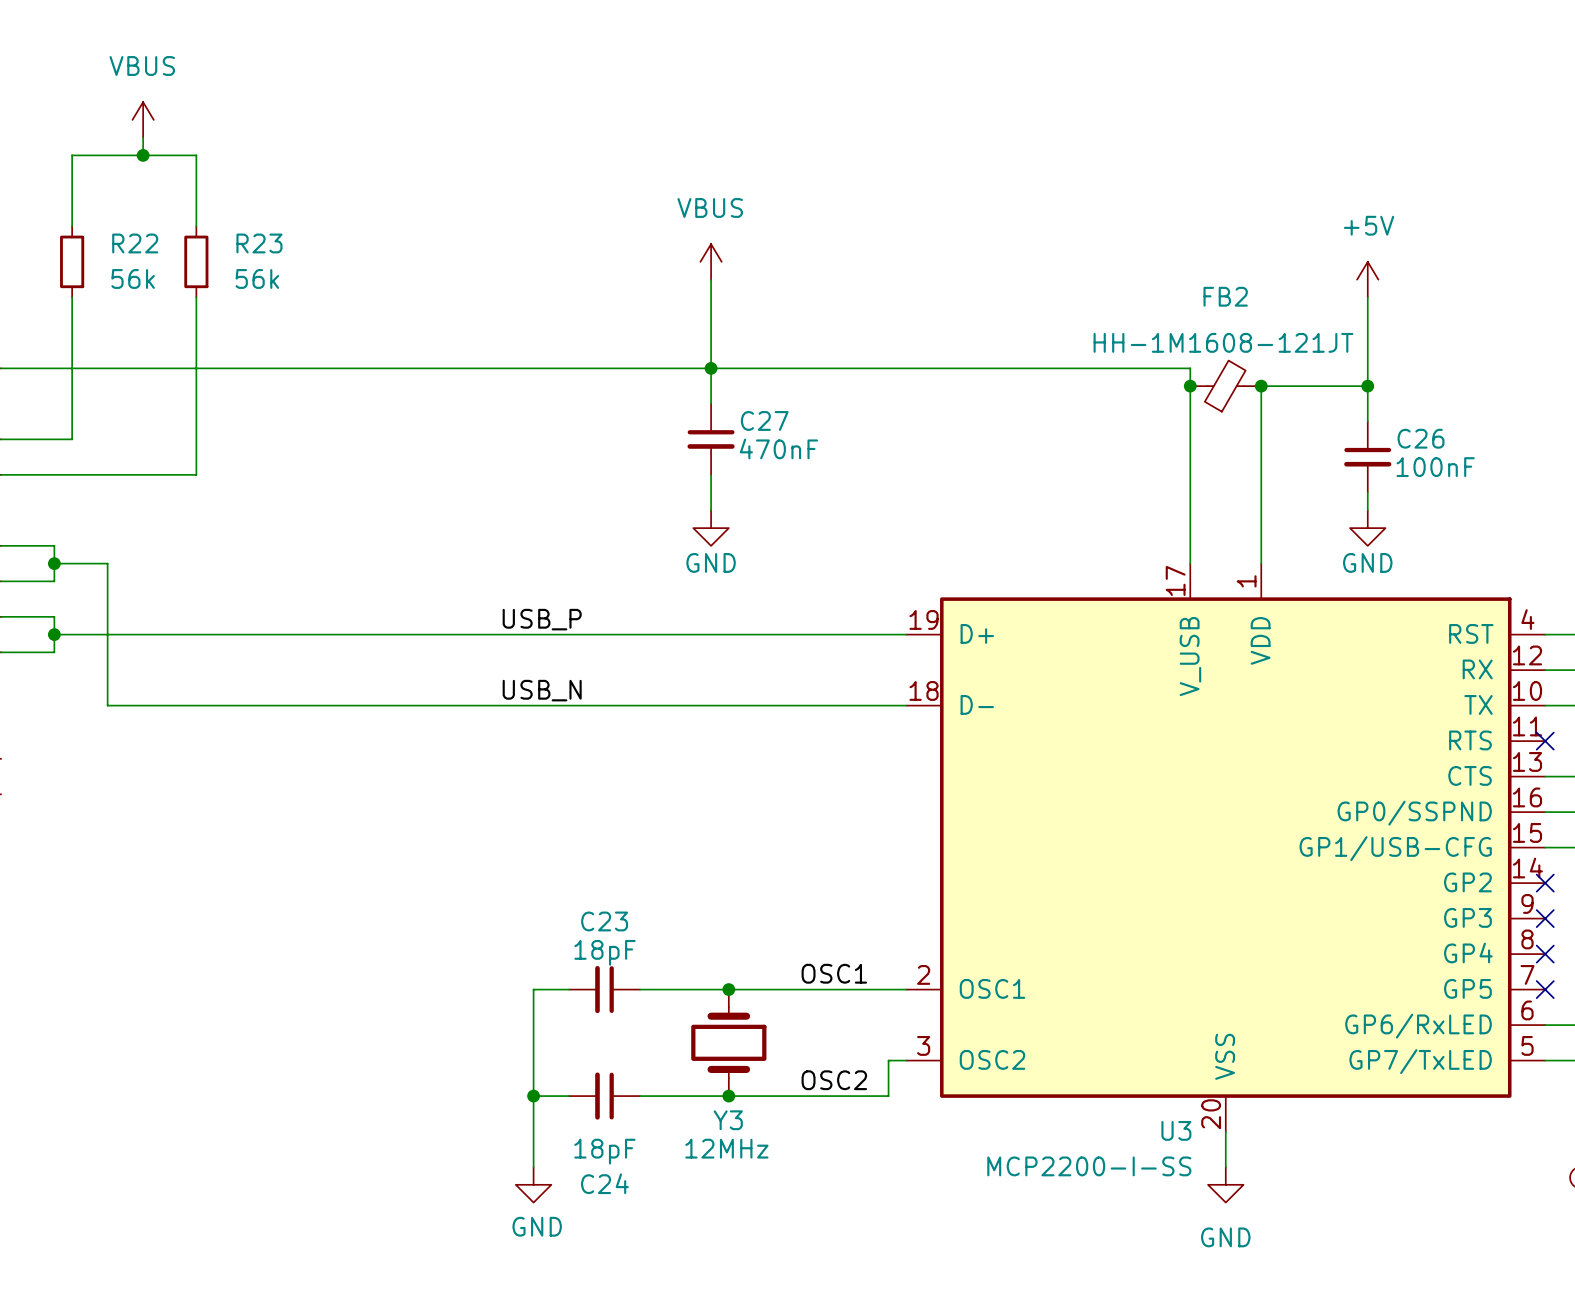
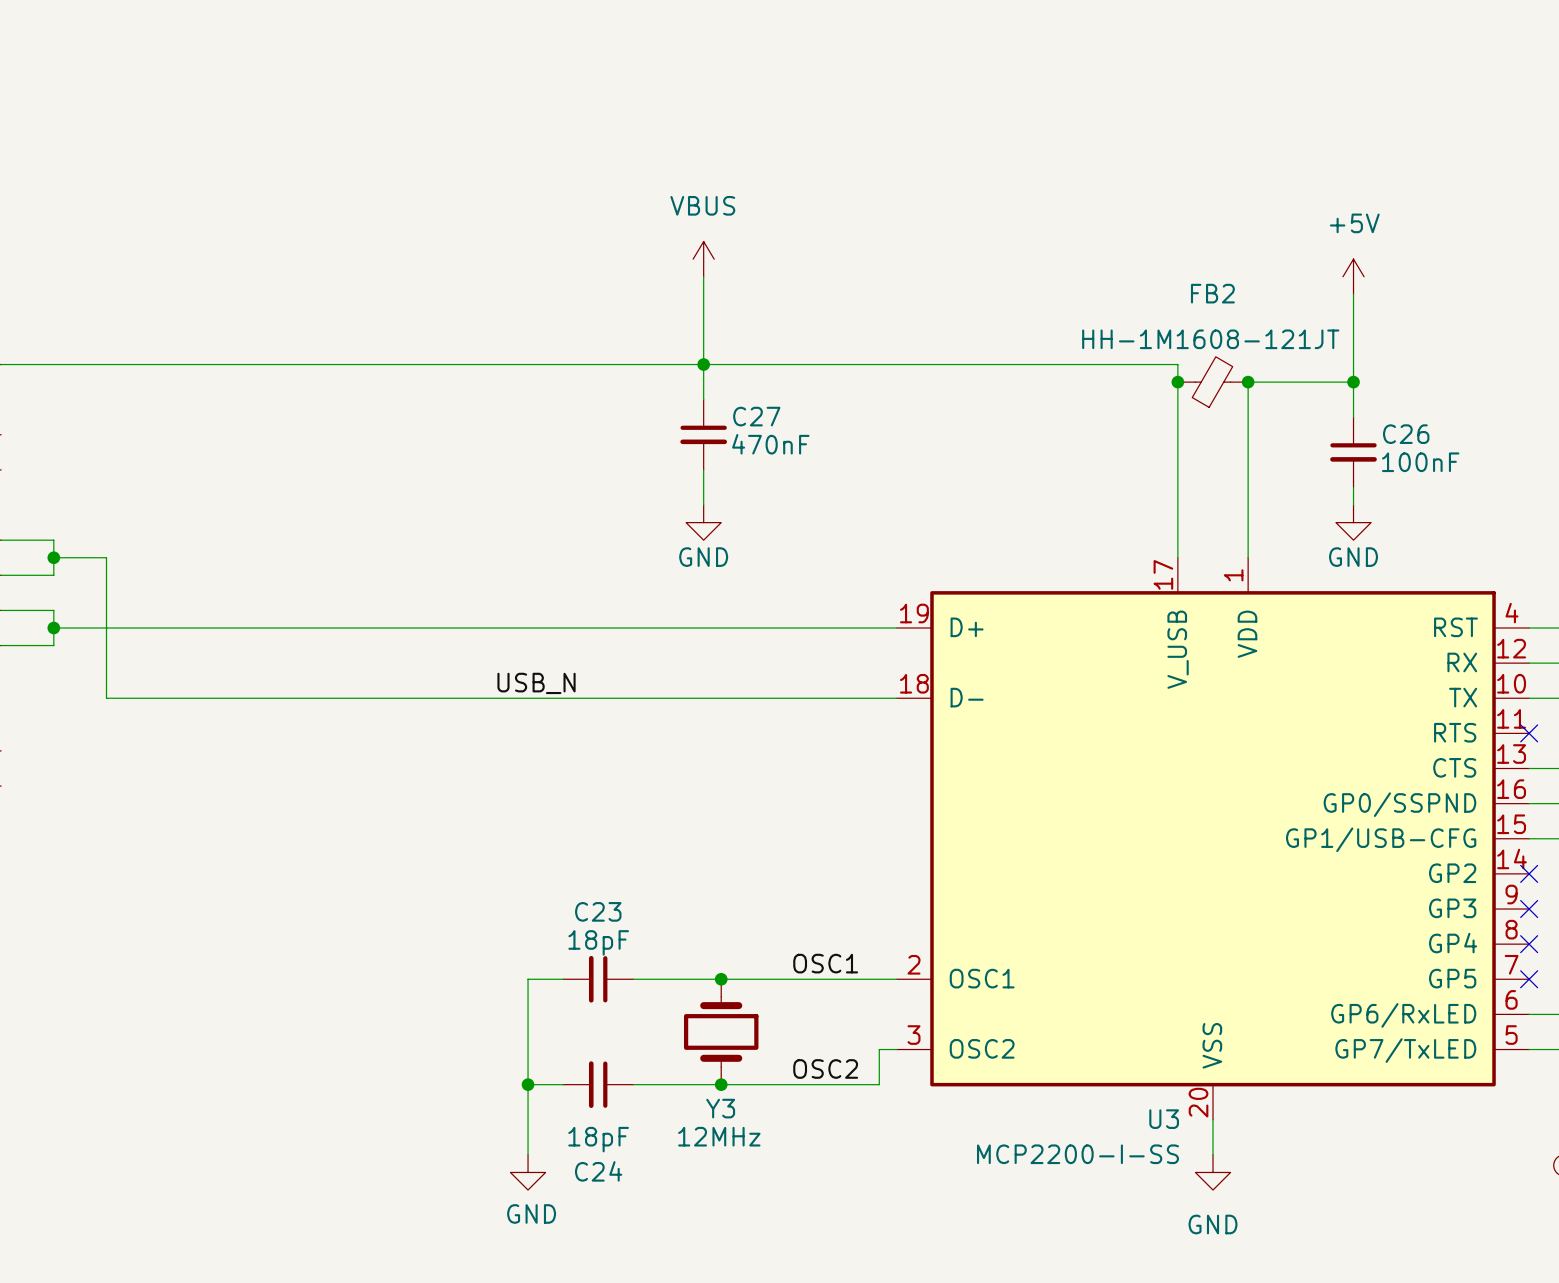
power symbol: VBUS (143, 119) -> none
wire: (143, 137) (143, 155) -> none
junction: (143, 155) -> none
wire: (72, 226) (72, 155) (196, 155) (196, 226) -> none
R22: 56k (72, 261) -> none
R23: 56k (196, 261) -> none
wire: (72, 297) (72, 439) (1, 439) -> none
wire: (196, 297) (196, 474) (1, 474) -> none
label: USB_P (542, 619) -> none

